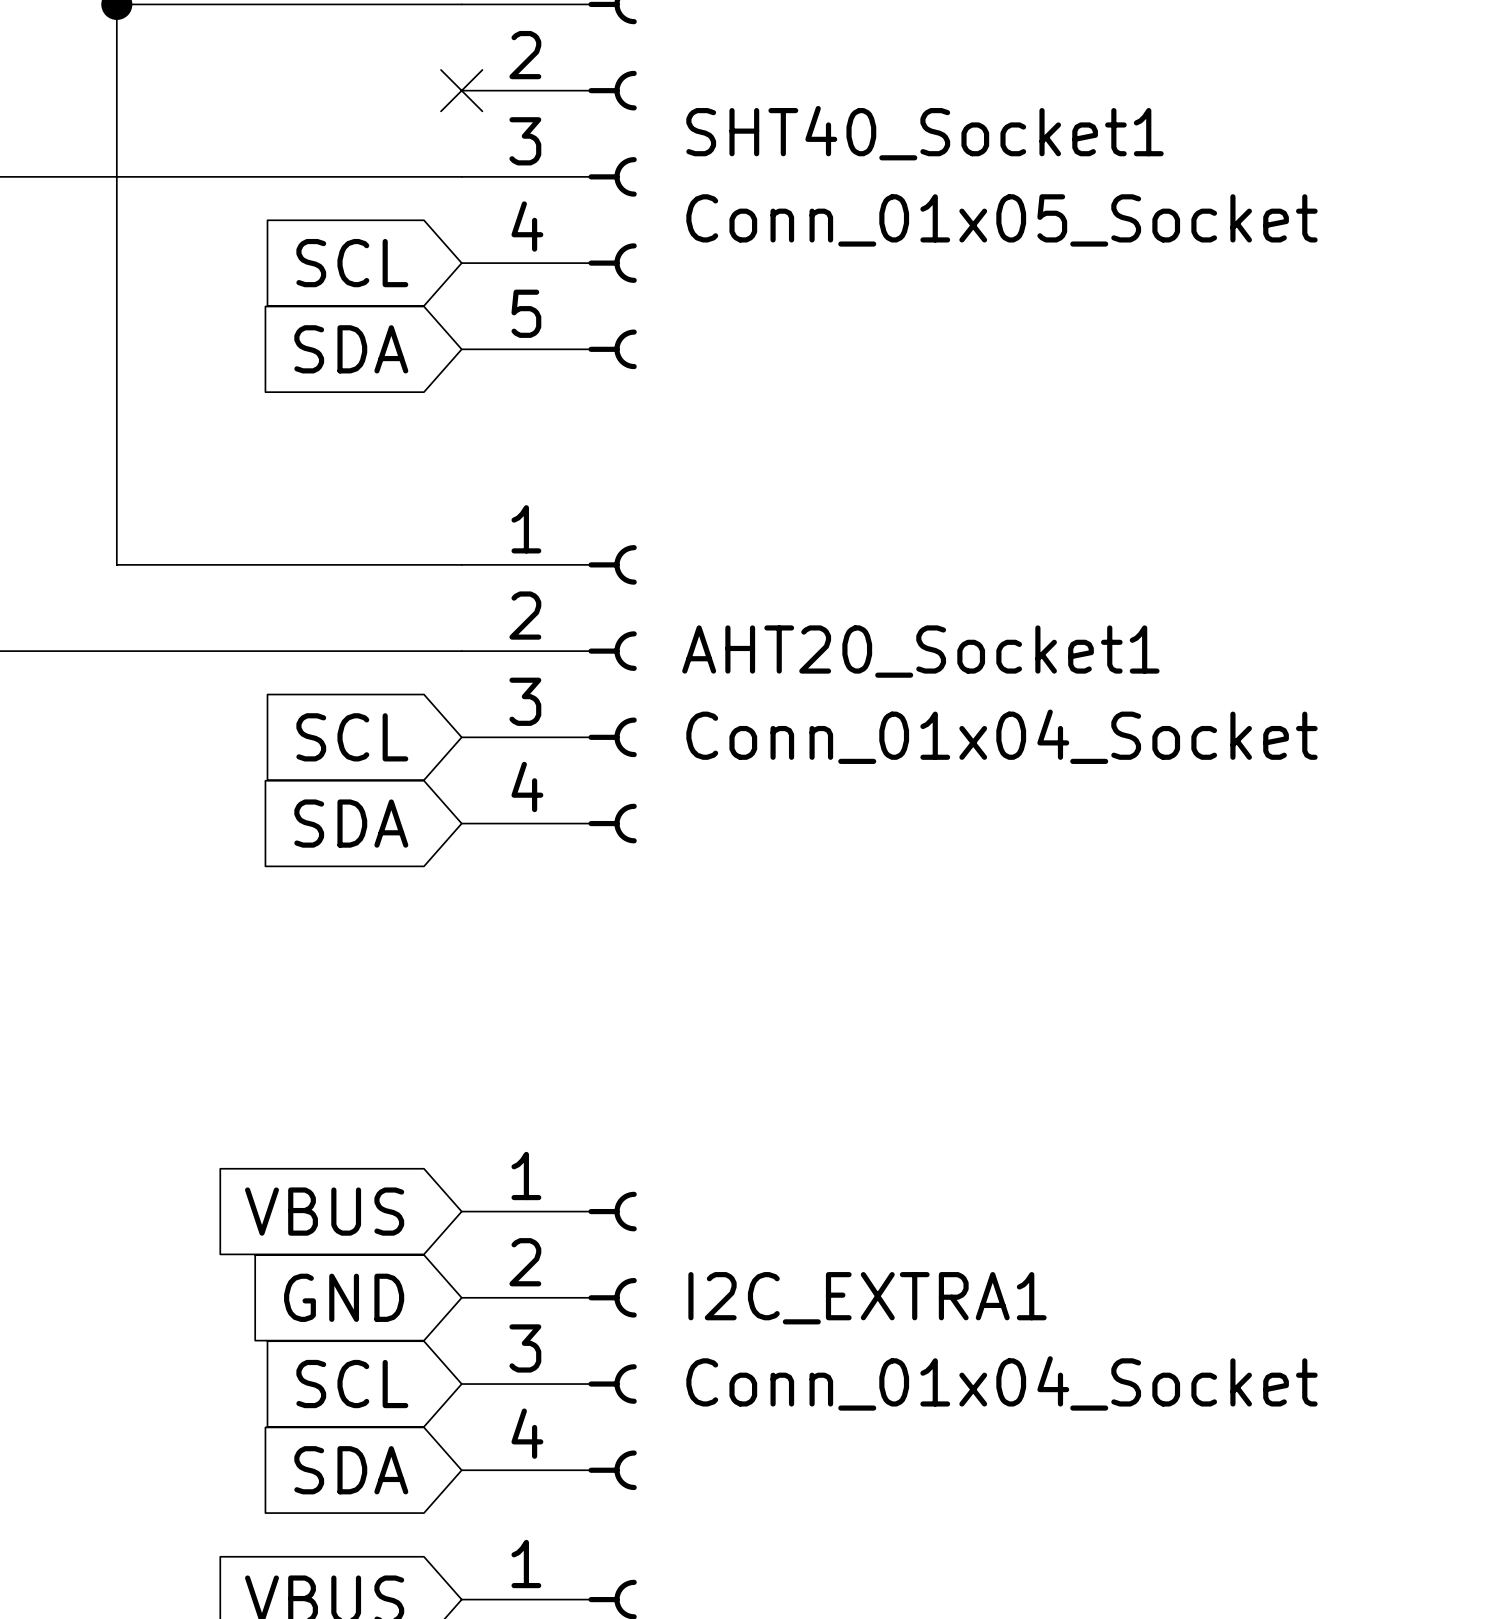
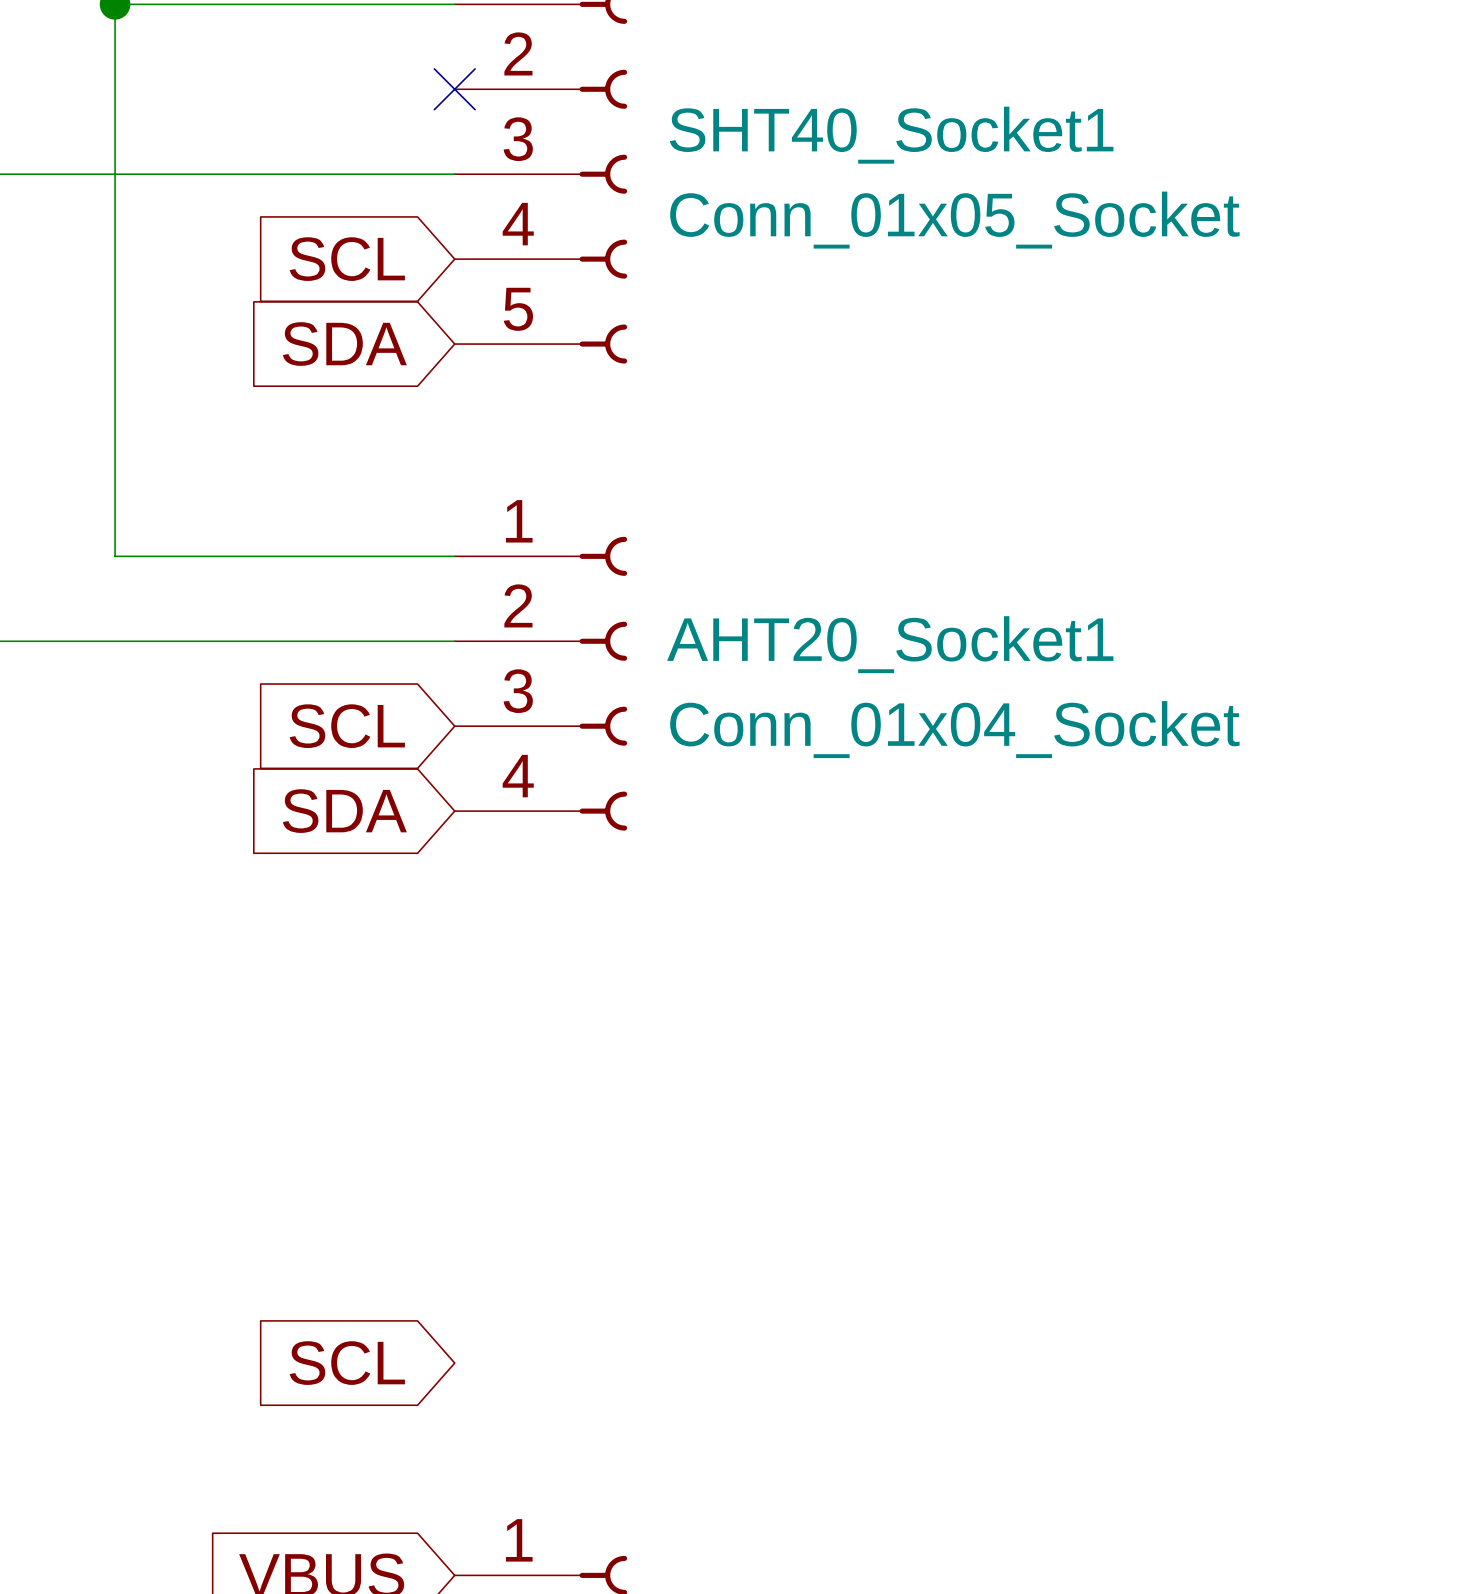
global label: VBUS (324, 1211) -> none
global label: GND (344, 1297) -> none
I2C_EXTRA1: Conn_01x04_Socket (549, 1340) -> none
global label: SDA (351, 1470) -> none

